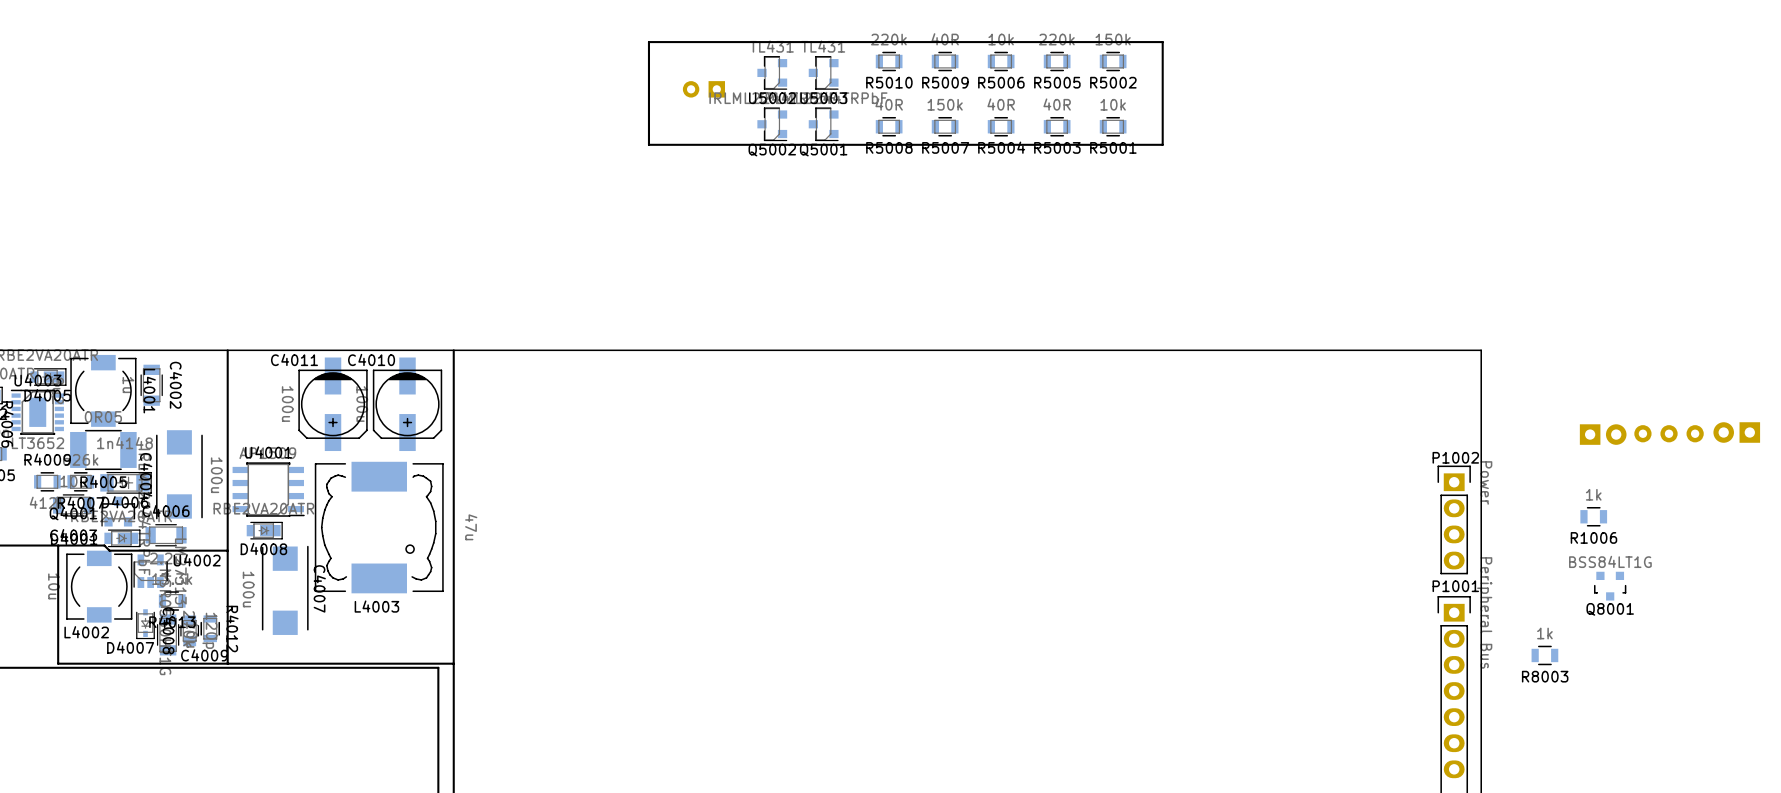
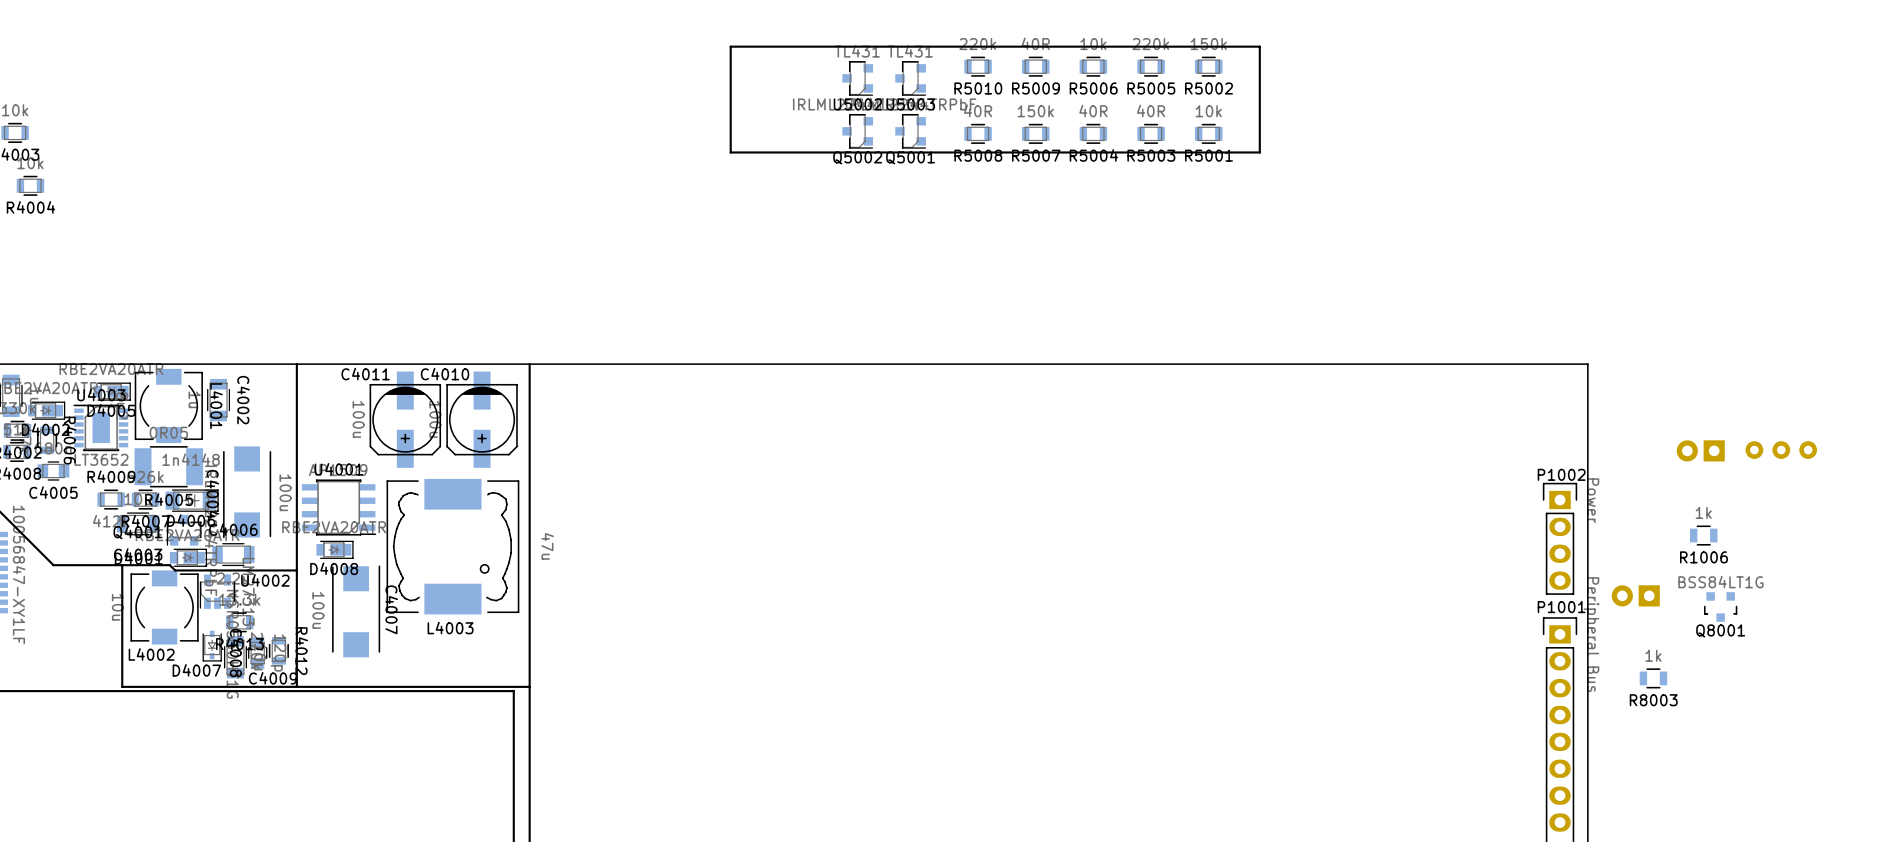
part: (703, 89) -> none
part: (1736, 432) -> none
part rotation: 0° (1603, 434) -> 180° (1700, 450)
part: none -> (1635, 595)

